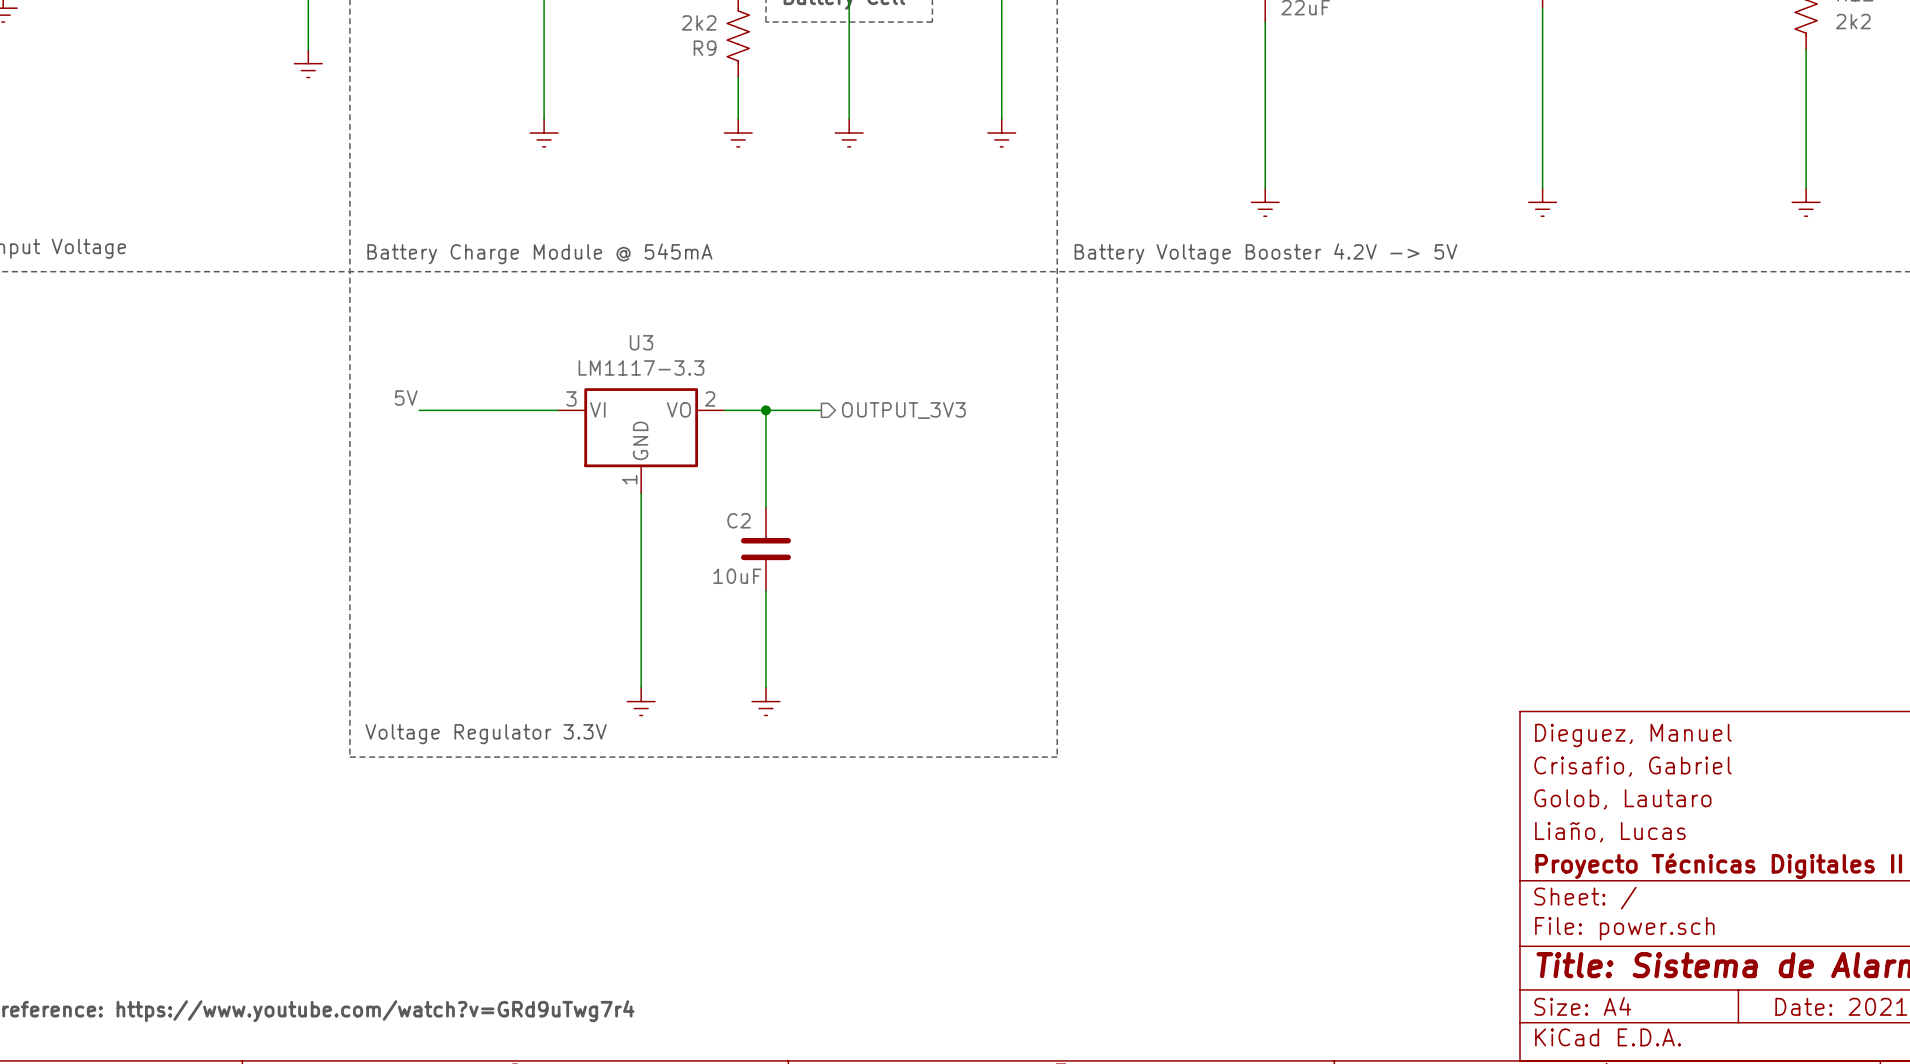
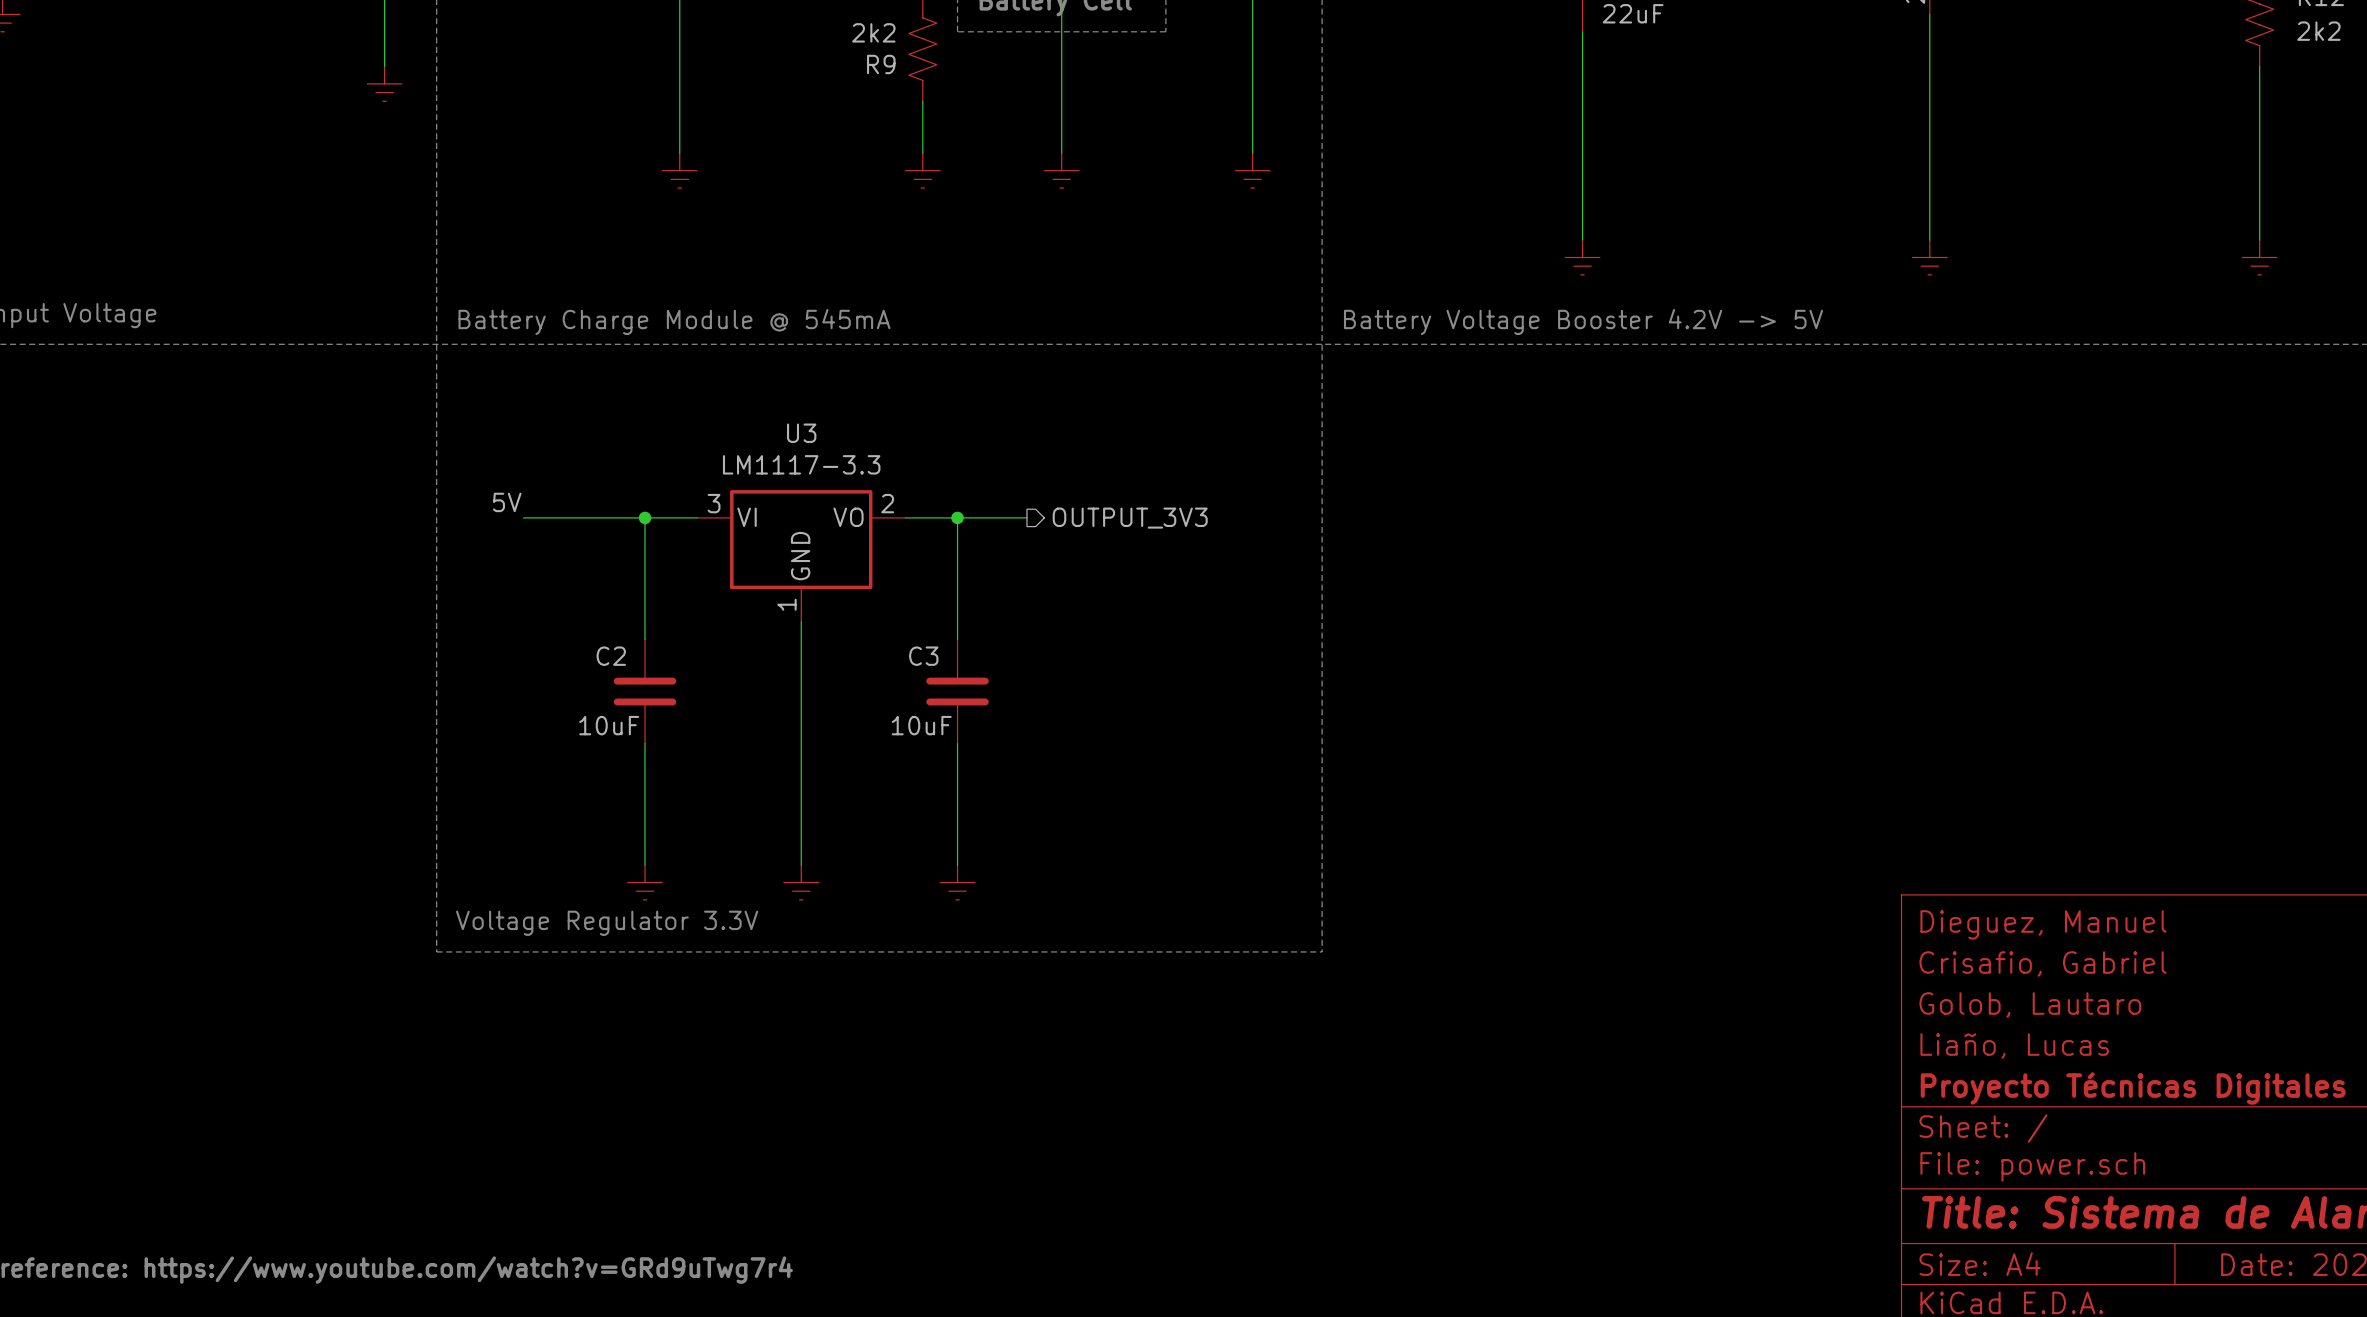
wire: none -> (645, 517) (645, 639)
junction: none -> (645, 517)
C2 name: C2 (739, 520) -> C3 (923, 656)
C2: none -> 10uF (645, 691)
wire: none -> (645, 743) (645, 865)
power symbol: none -> (645, 882)

